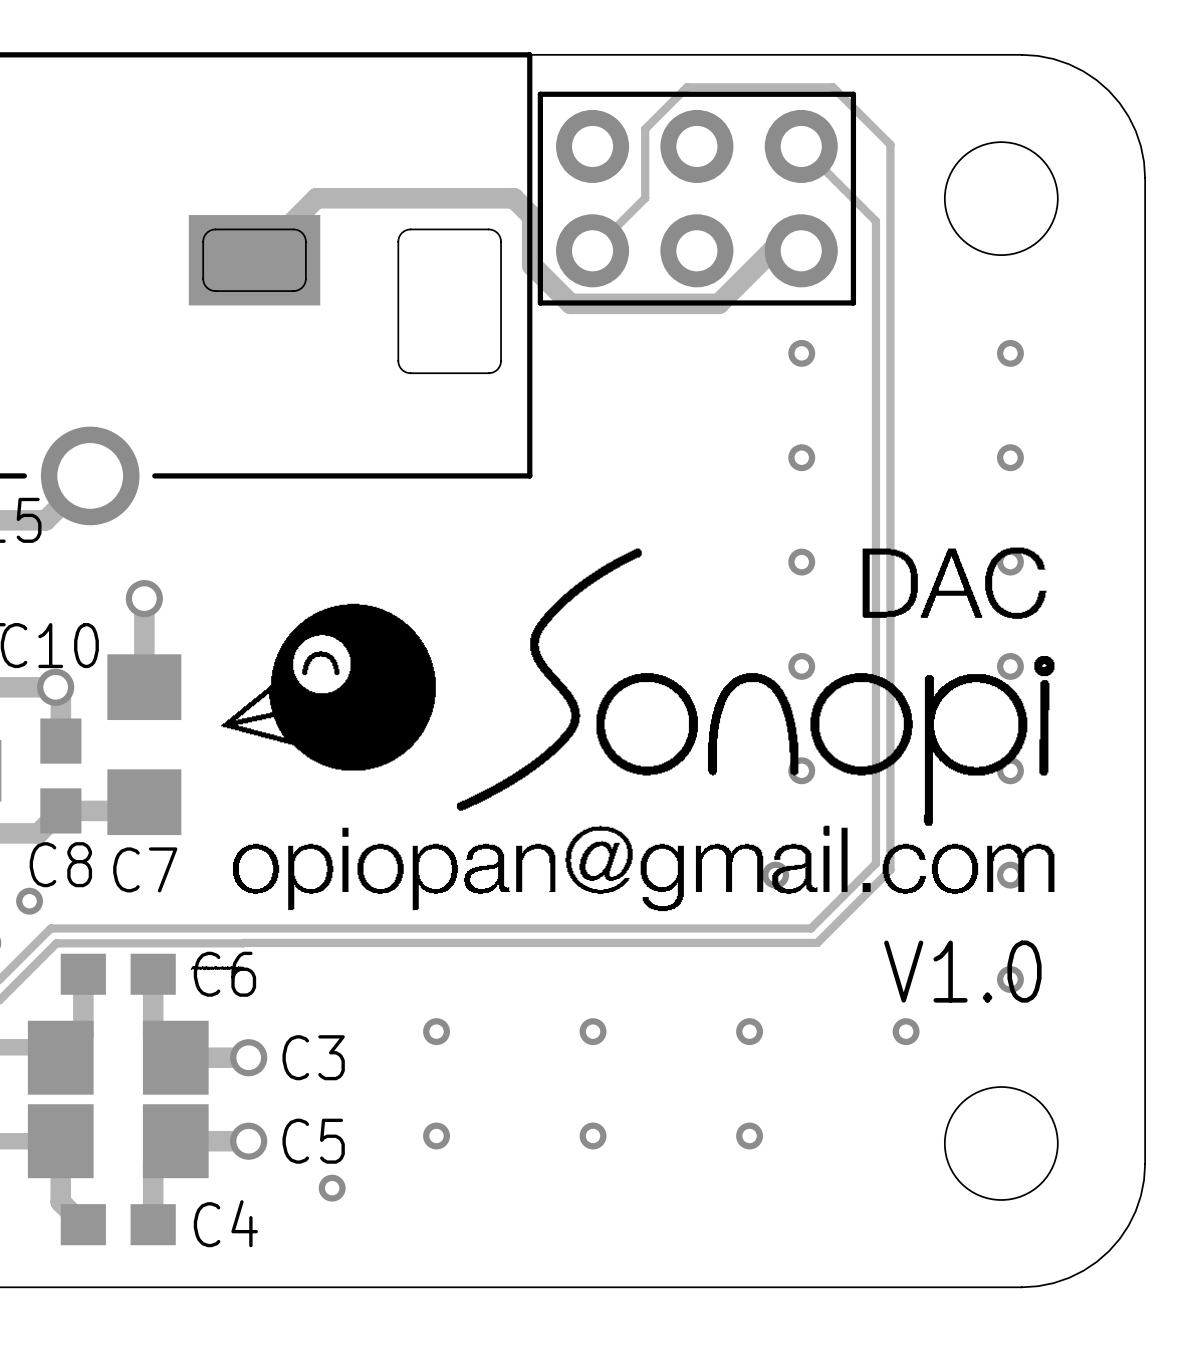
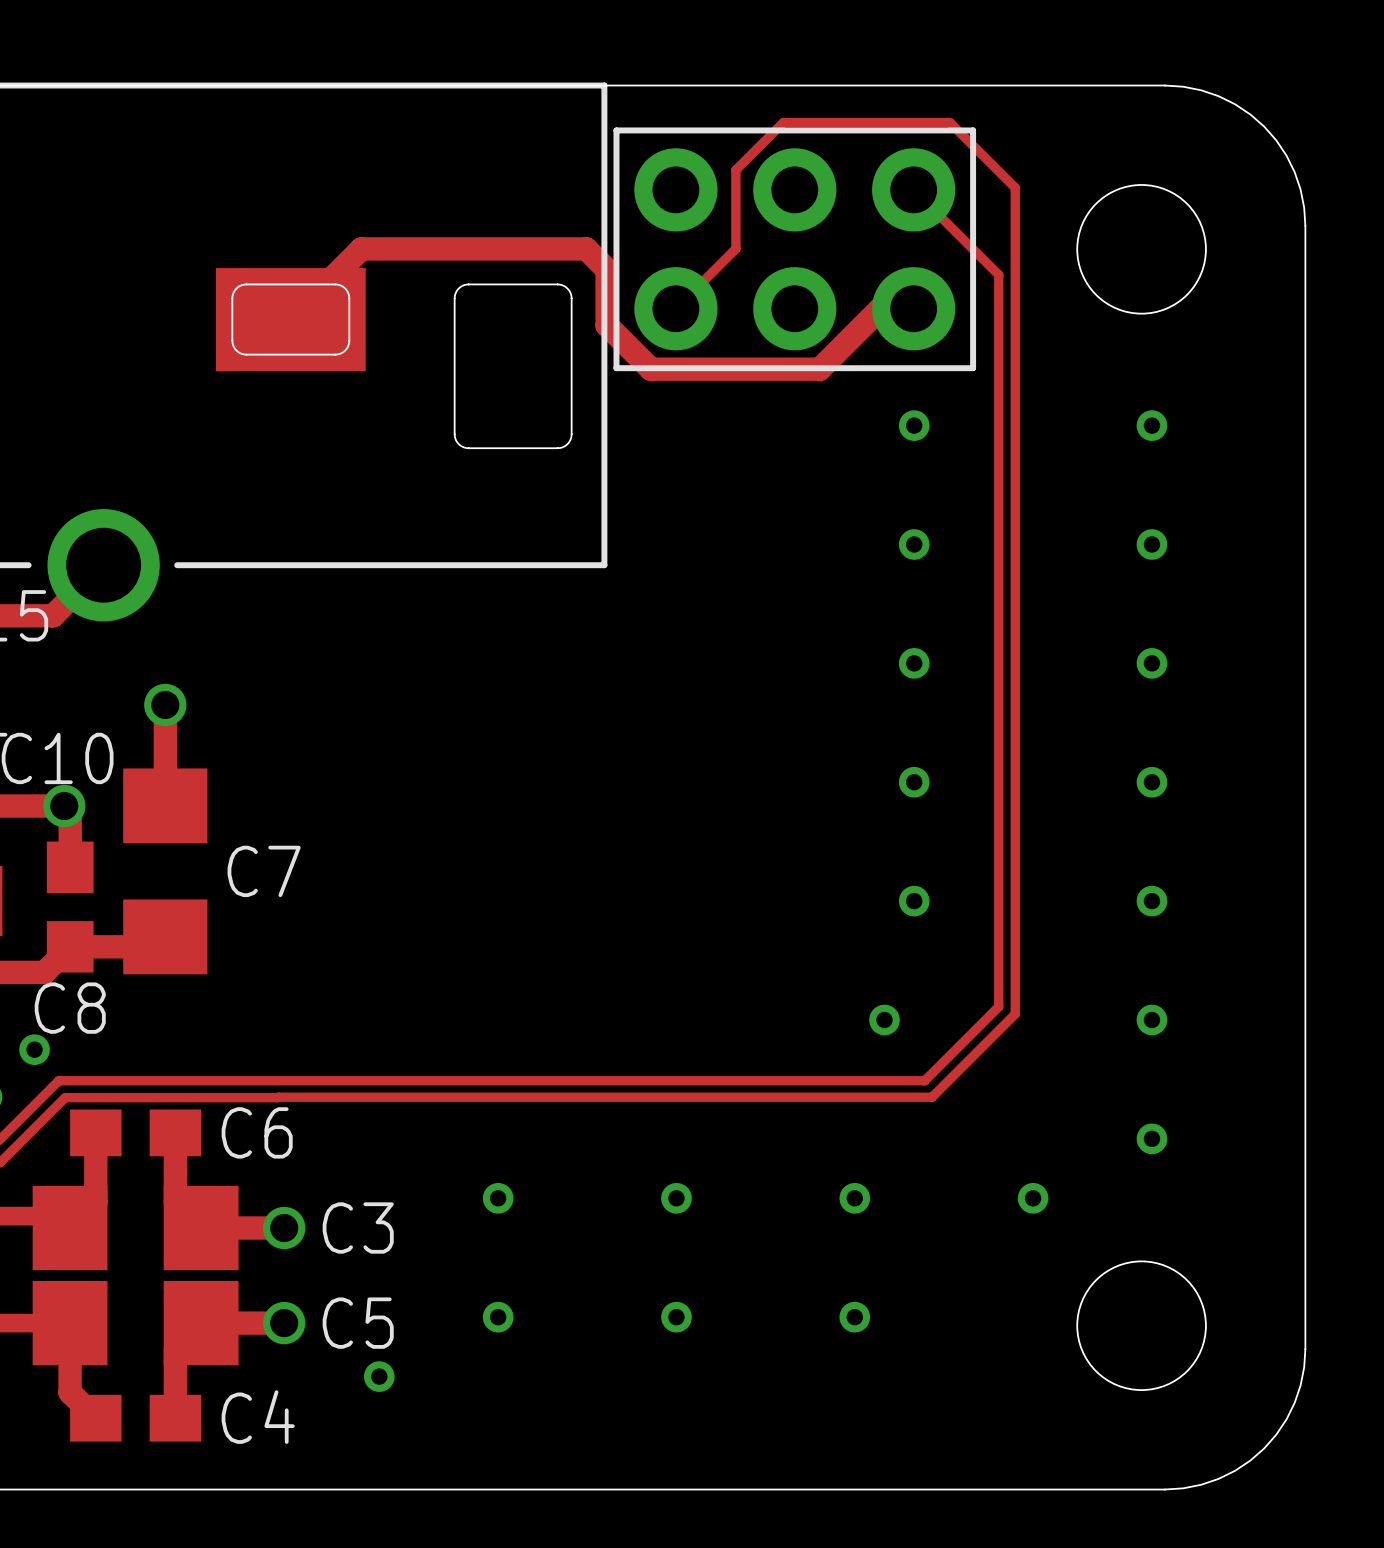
drawing: [220, 547, 1055, 912] -> none
C7 name position: C7 (145, 869) -> C7 (264, 871)
text: V1.0 (962, 971) -> none

